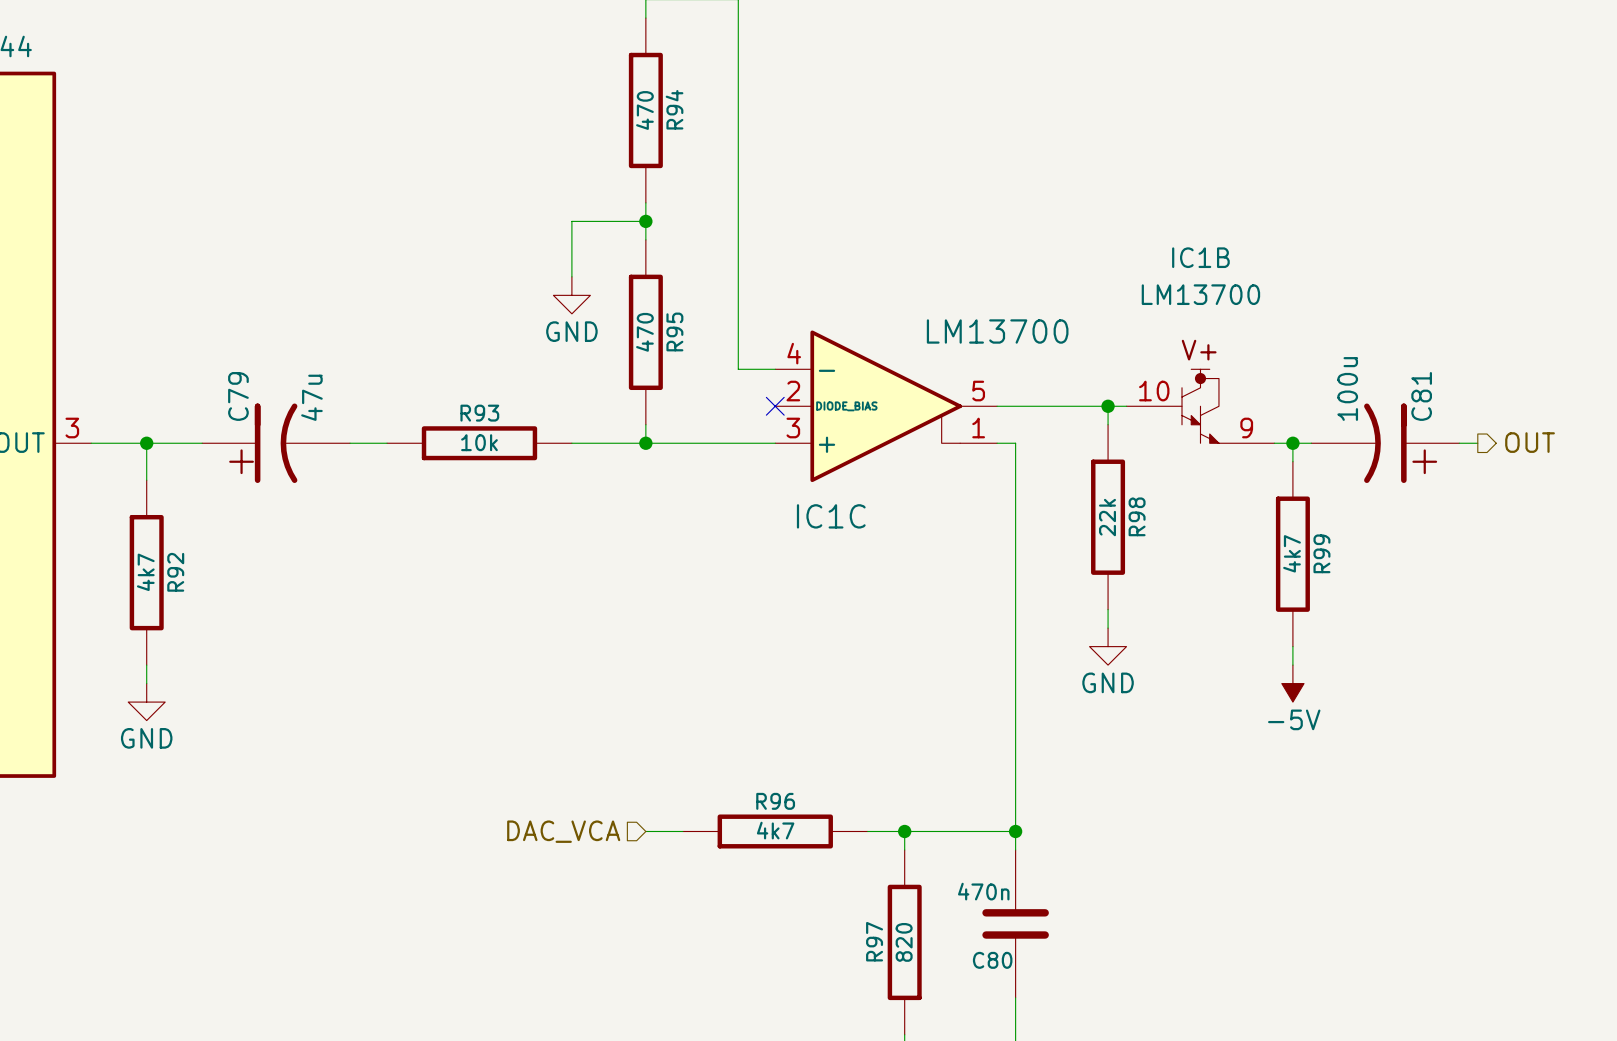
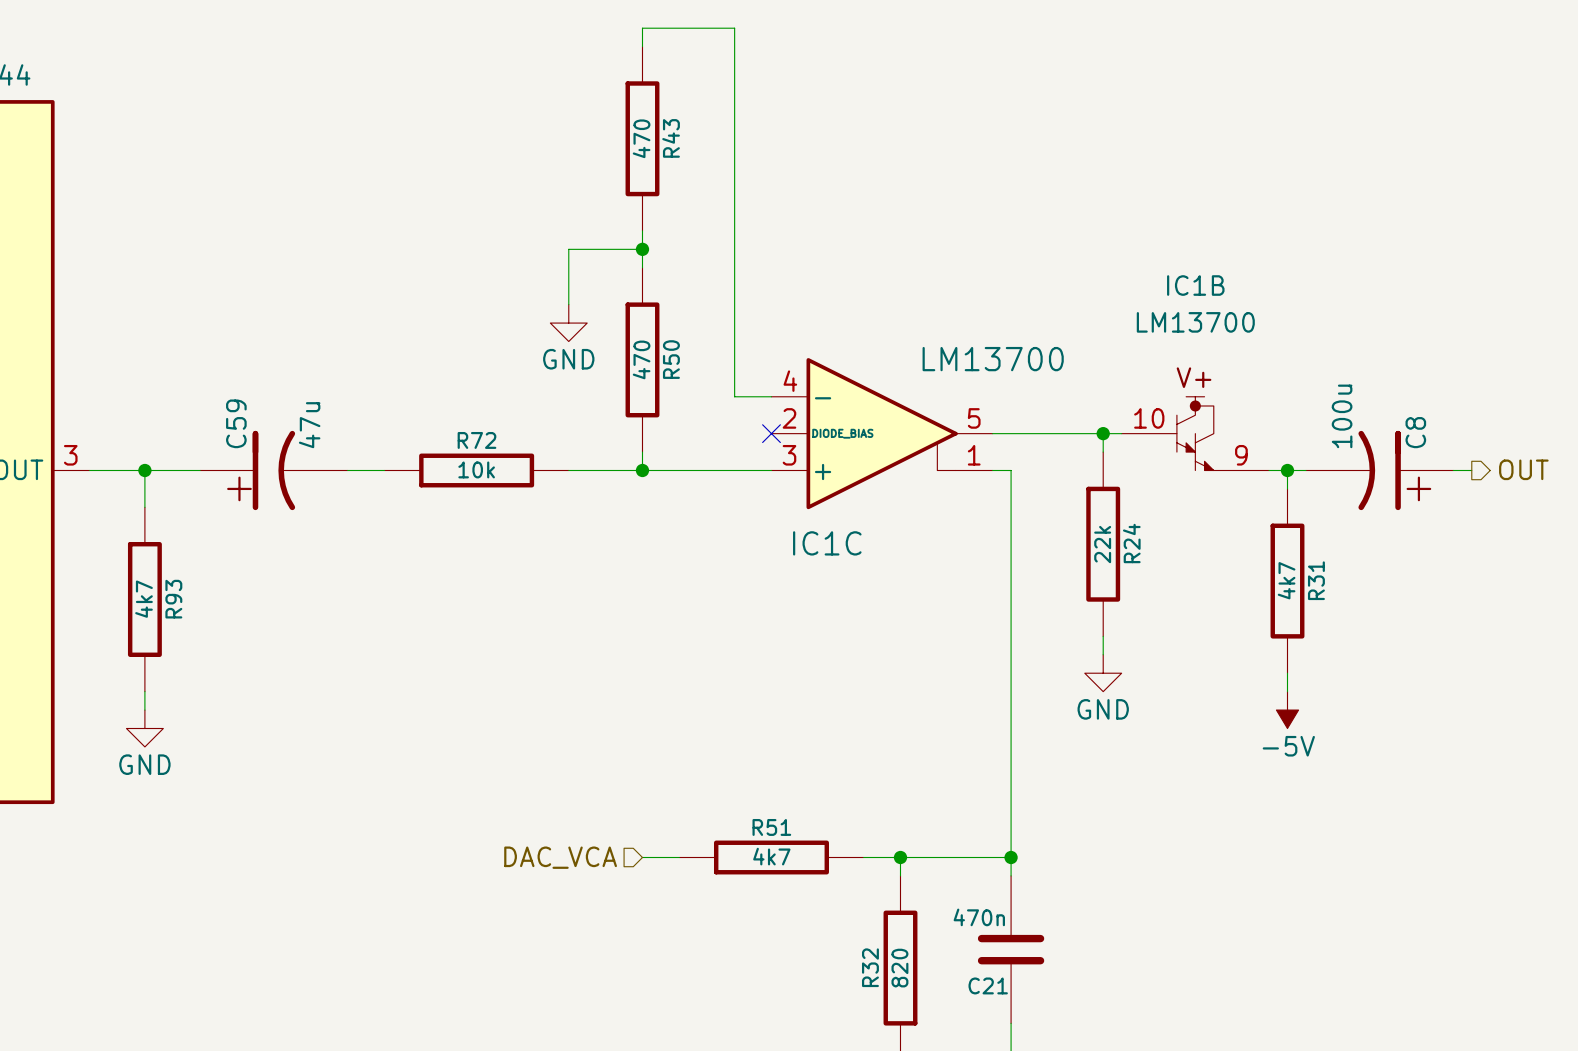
R94 name: R94 (674, 109) -> R43 (671, 138)
R95 name: R95 (674, 331) -> R50 (671, 359)
C79 name: C79 (238, 396) -> C59 (236, 423)
C81 name: C81 (1421, 396) -> C8 (1415, 432)
R93 name: R93 (479, 413) -> R72 (476, 440)
R98 name: R98 (1137, 516) -> R24 (1131, 543)
R99 name: R99 (1321, 553) -> R31 (1316, 580)
R92 name: R92 (175, 572) -> R93 (173, 599)
R96 name: R96 (775, 801) -> R51 (771, 827)
R97 name: R97 (874, 941) -> R32 (870, 967)
C80 name: C80 (992, 960) -> C21 (988, 985)

